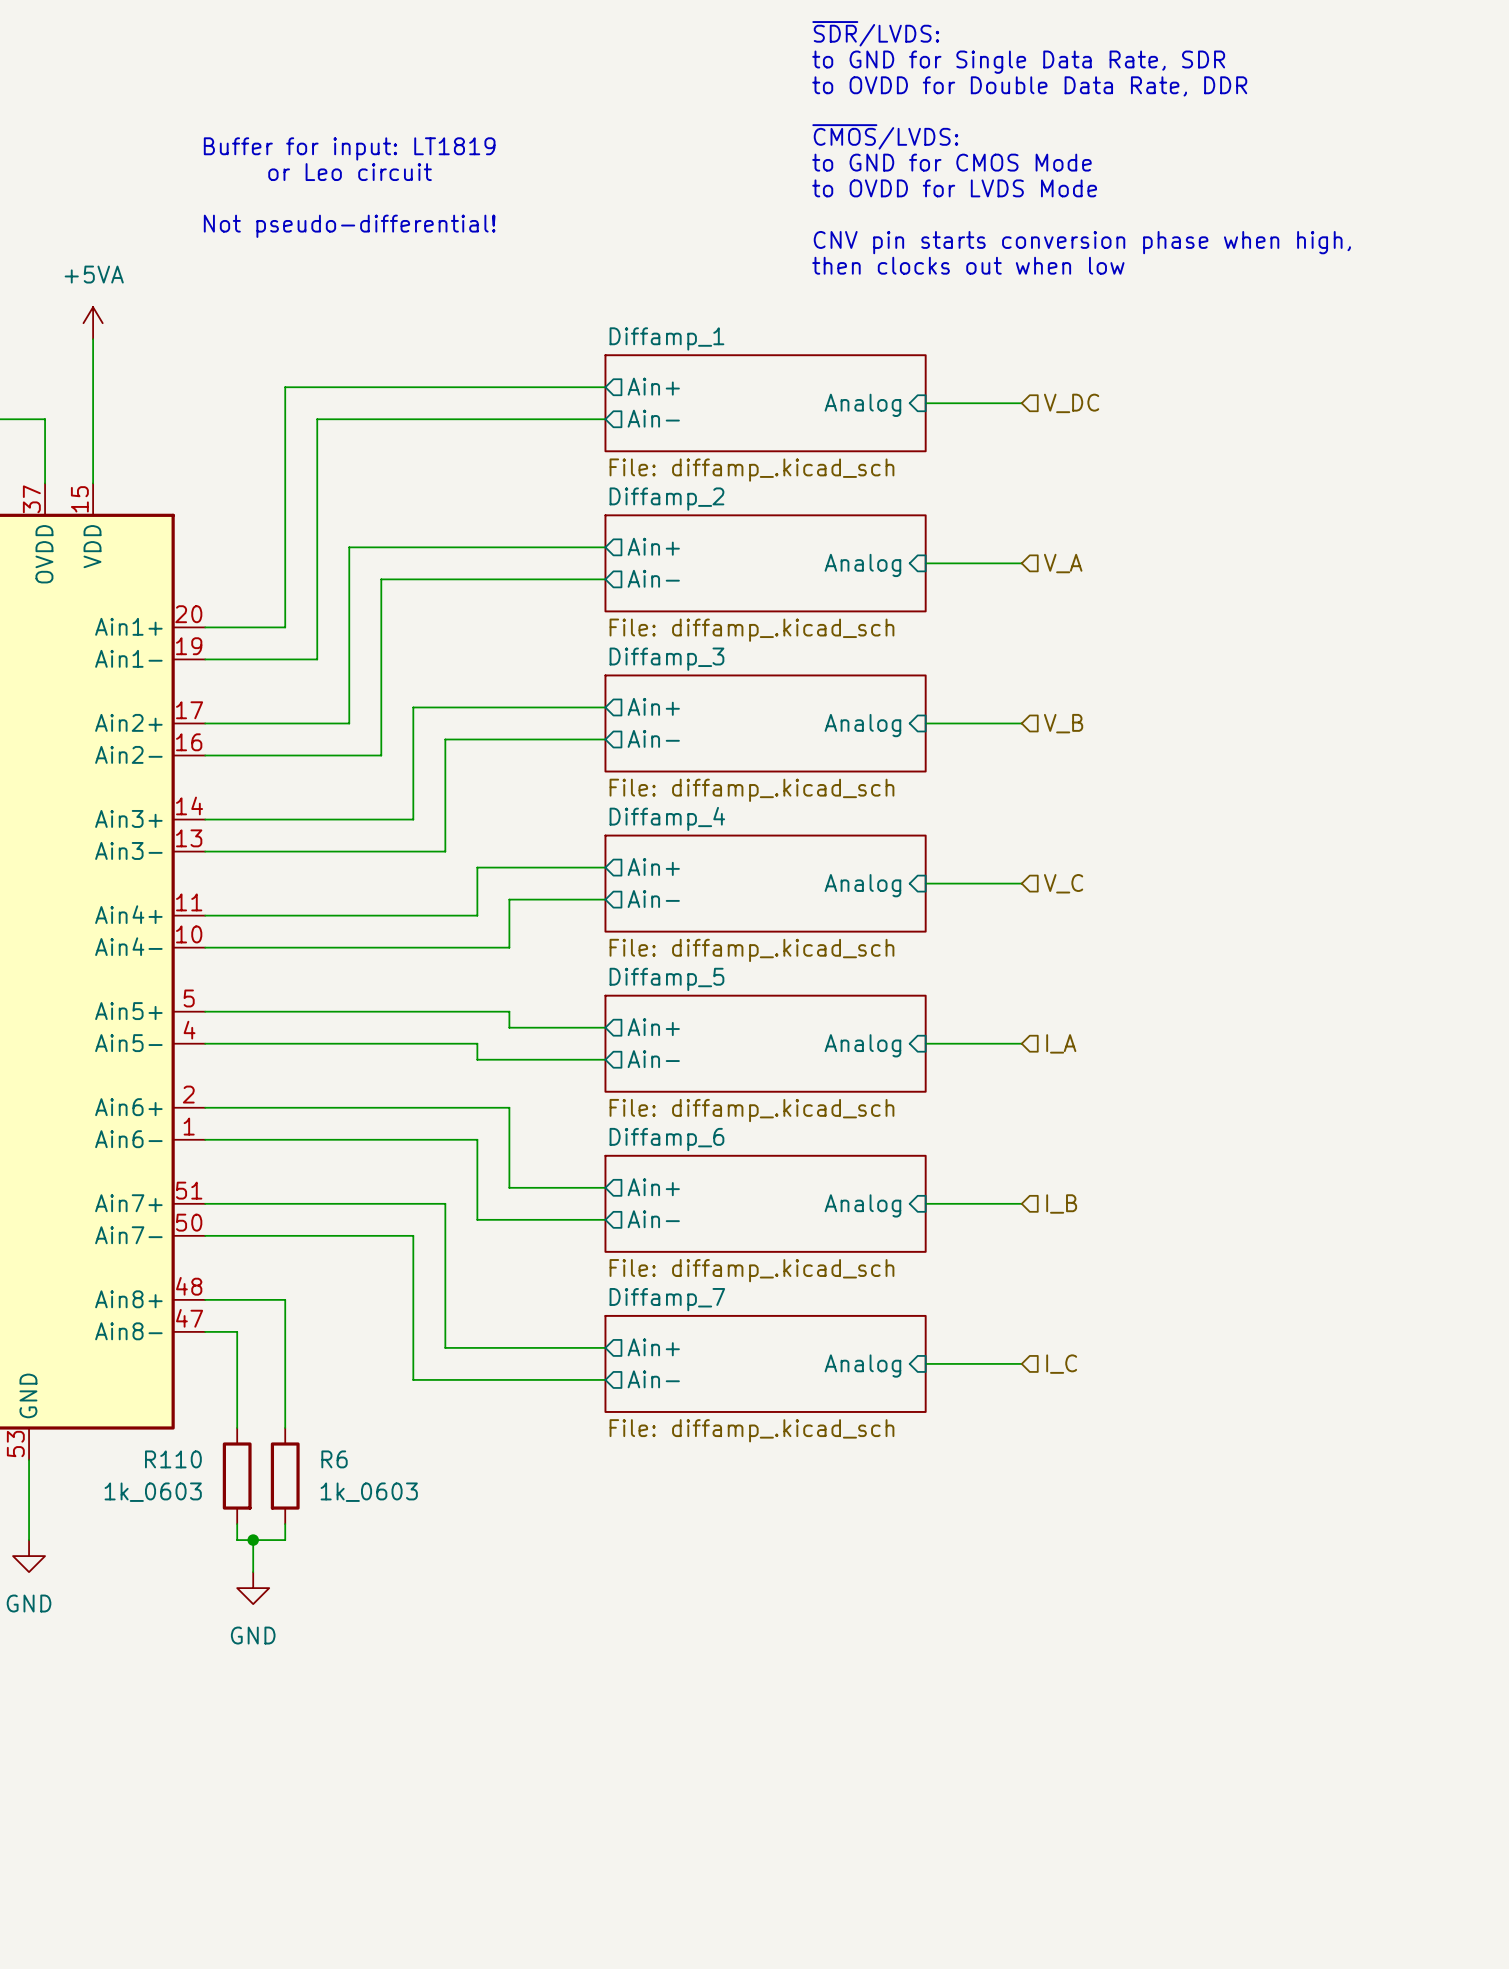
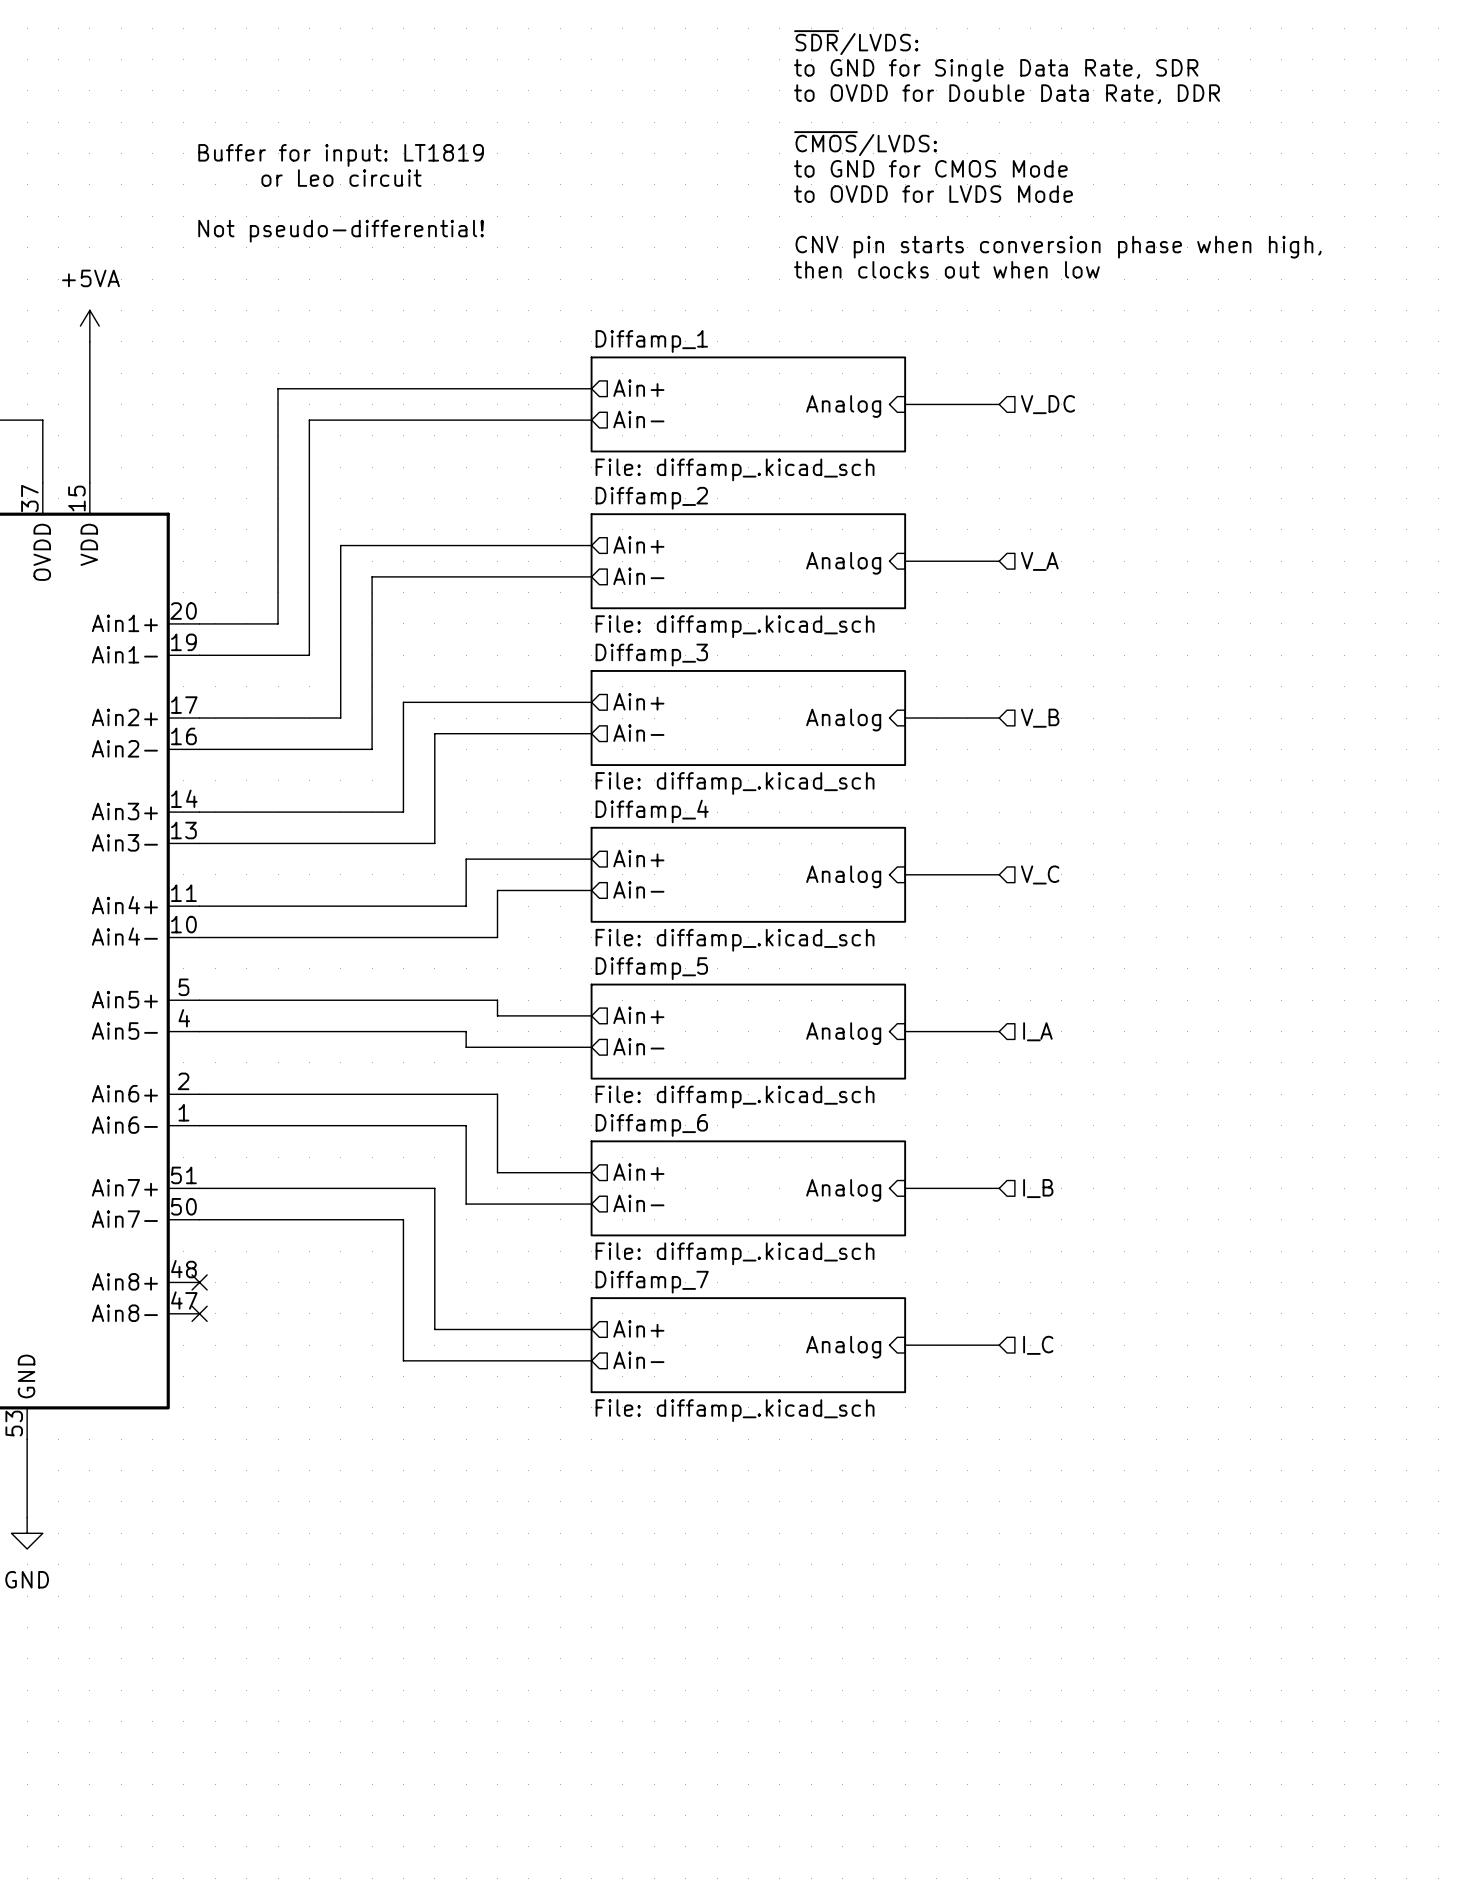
wire: (205, 1299) (285, 1299) (285, 1427) -> none
no-connect mark: none -> (199, 1282)
wire: (205, 1331) (237, 1331) (237, 1427) -> none
no-connect mark: none -> (199, 1313)
R110: 1k_0603 (237, 1476) -> none
R6: 1k_0603 (285, 1476) -> none
wire: (237, 1524) (237, 1540) (285, 1540) (285, 1524) -> none
wire: (253, 1540) (253, 1572) -> none
junction: (253, 1540) -> none
power symbol: GND (253, 1588) -> none

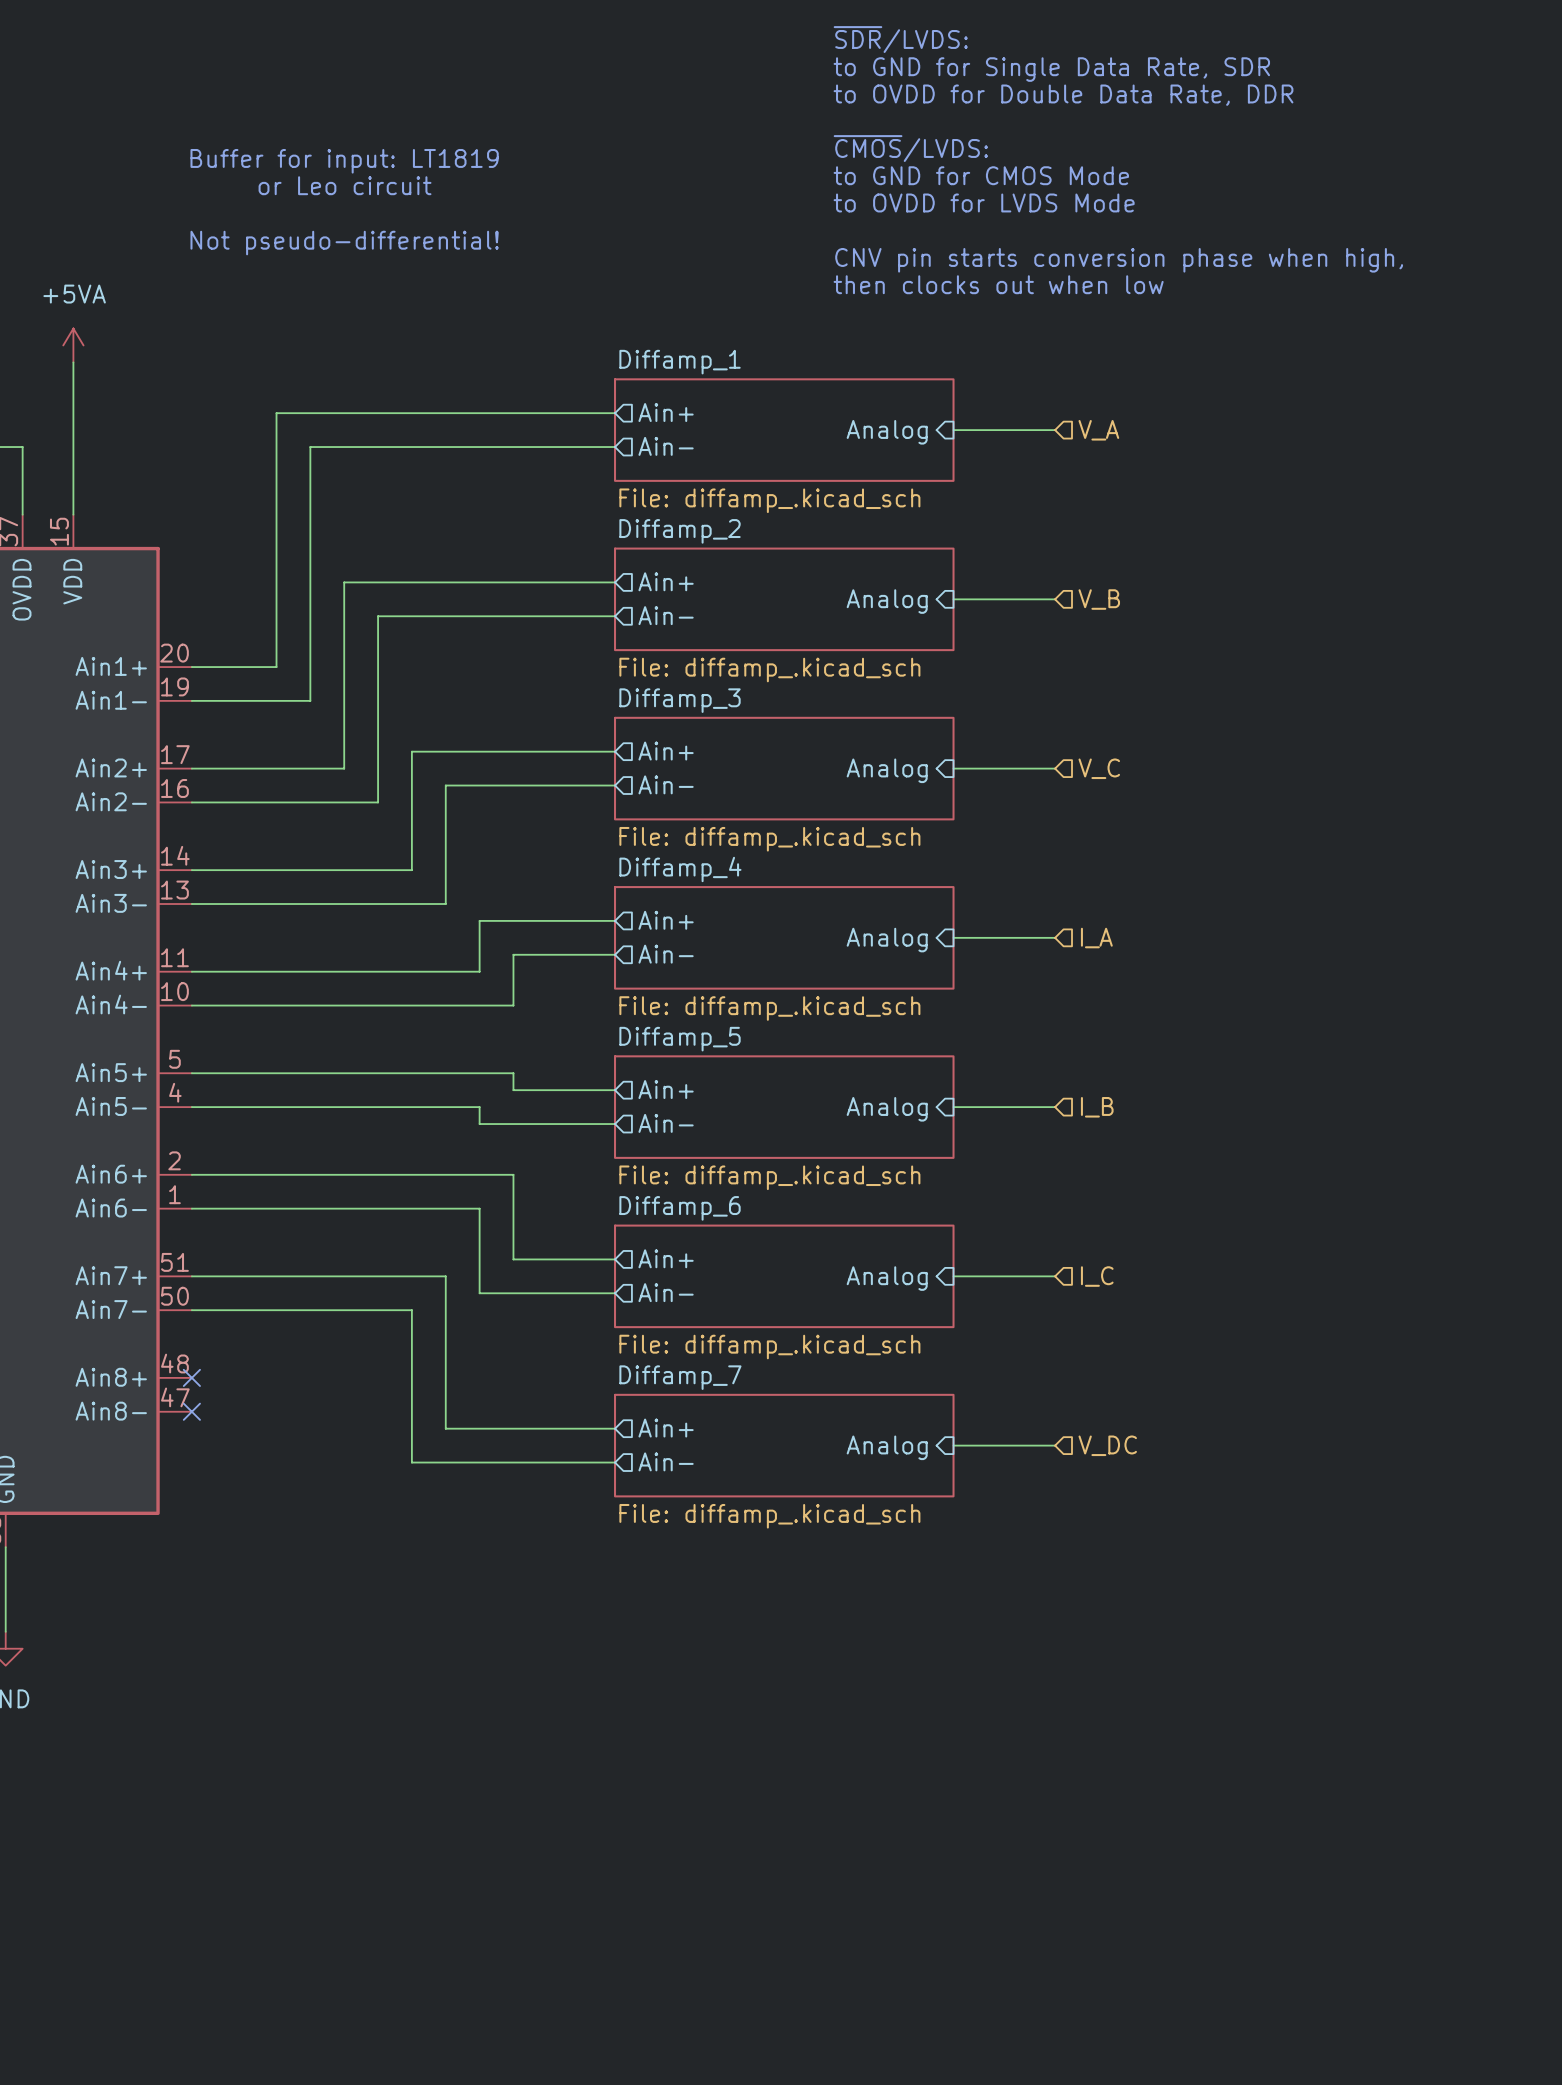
hierarchical label: V_DC (1047, 404) -> V_A (1098, 430)
hierarchical label: V_A (1039, 561) -> V_B (1099, 599)
hierarchical label: V_B (1040, 718) -> V_C (1099, 768)
hierarchical label: V_C (1040, 874) -> I_A (1096, 938)
hierarchical label: I_A (1037, 1031) -> I_B (1097, 1107)
hierarchical label: I_B (1038, 1188) -> I_C (1097, 1276)
hierarchical label: I_C (1038, 1345) -> V_DC (1107, 1445)

